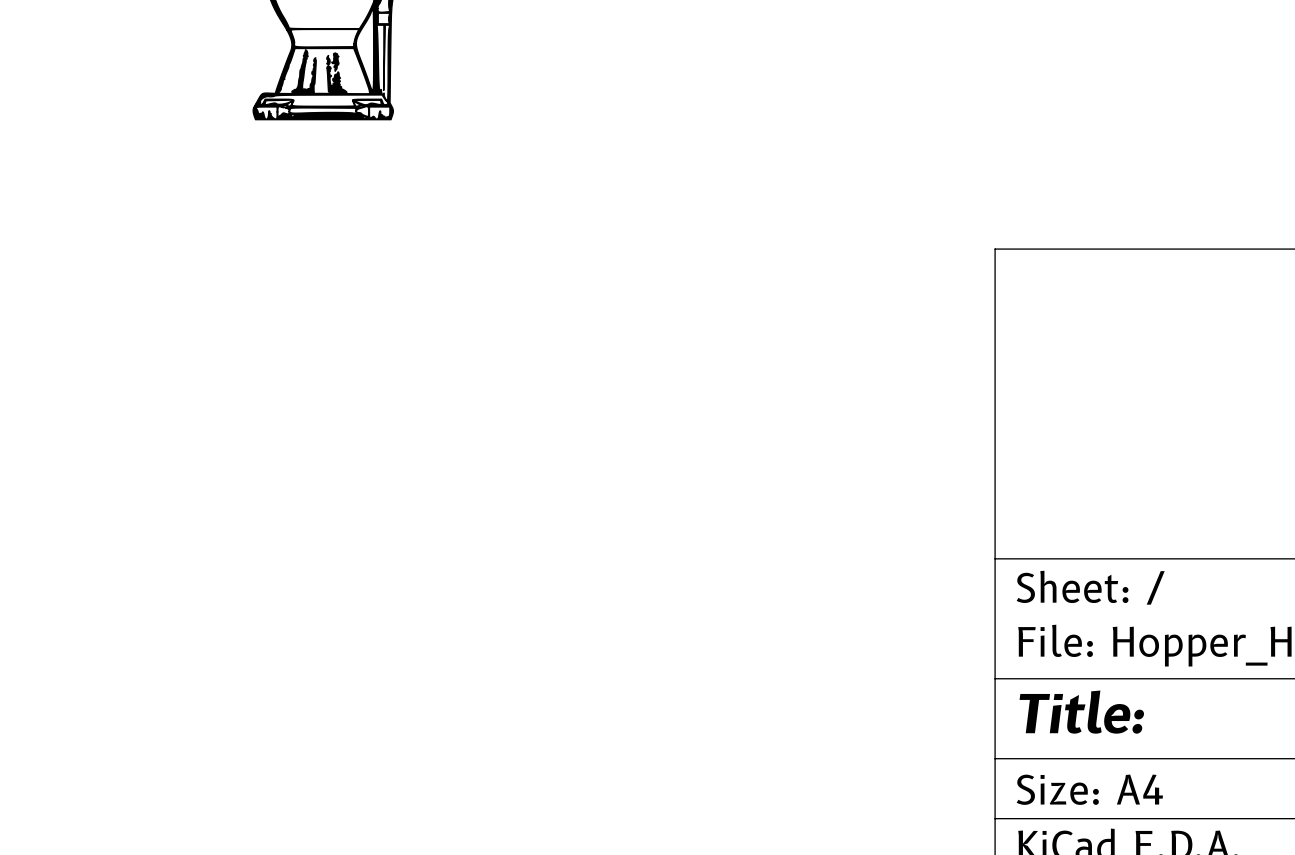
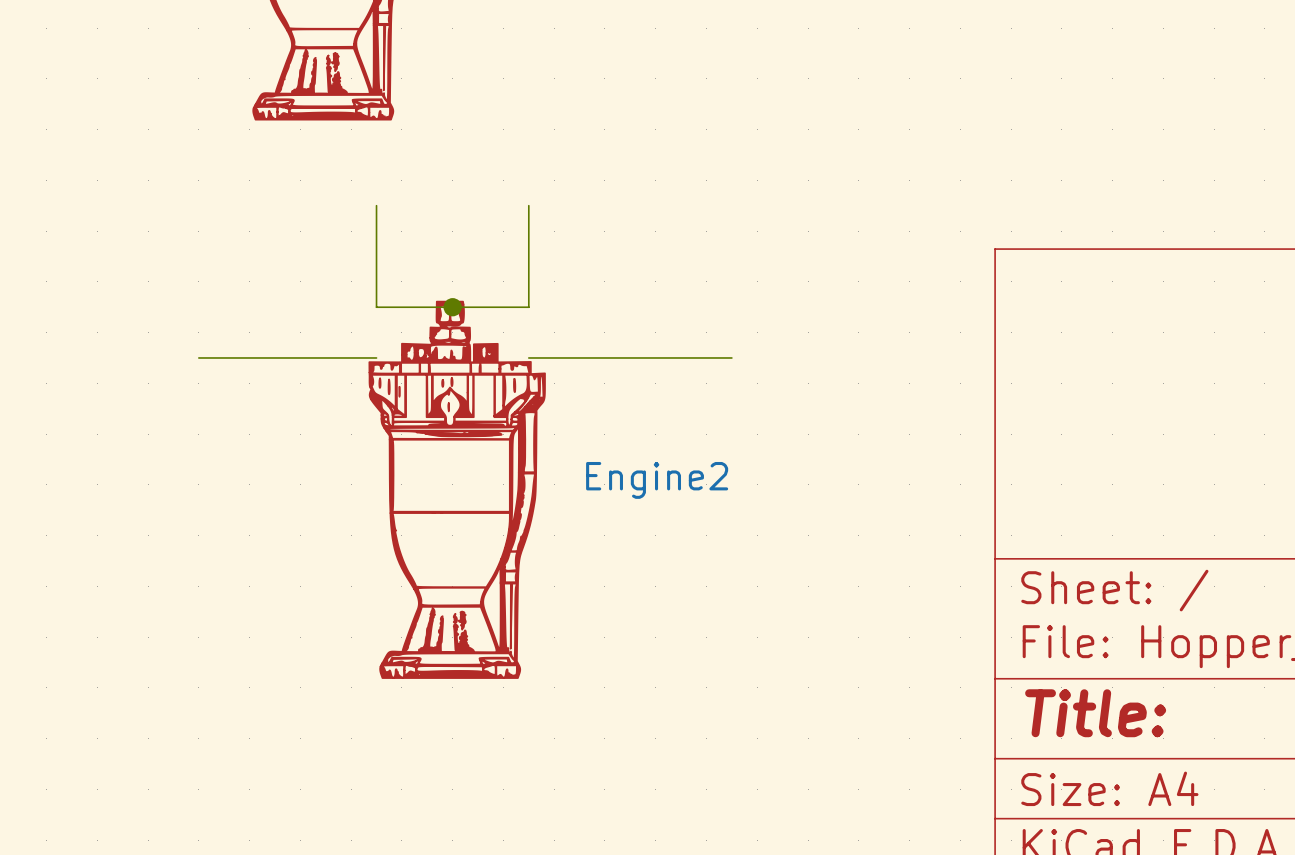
wire: none -> (376, 205) (376, 307) (528, 307) (528, 205)
junction: none -> (452, 307)
wire: none -> (198, 357) (376, 357)
wire: none -> (528, 357) (731, 357)
Engine2: none -> (457, 489)

